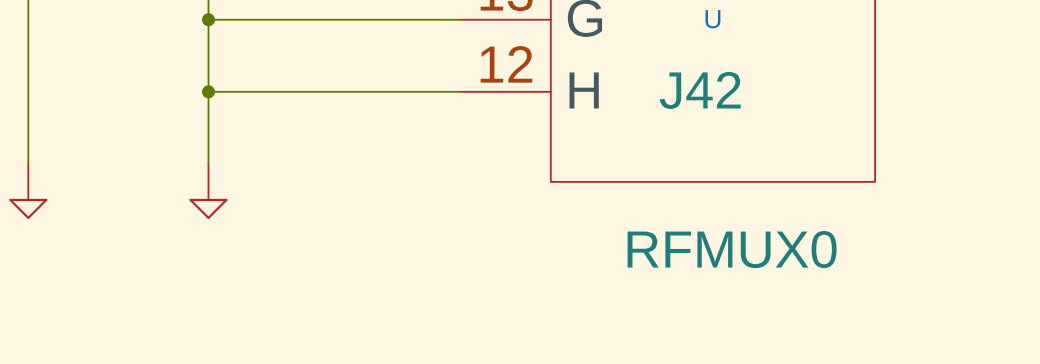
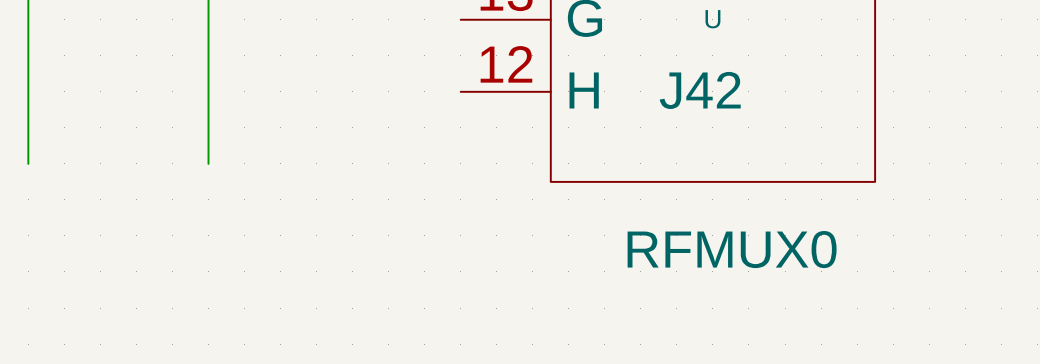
wire: (208, 19) (460, 19) -> none
junction: (208, 19) -> none
wire: (208, 91) (460, 91) -> none
junction: (208, 91) -> none
power symbol: (28, 191) -> none
power symbol: (208, 191) -> none

